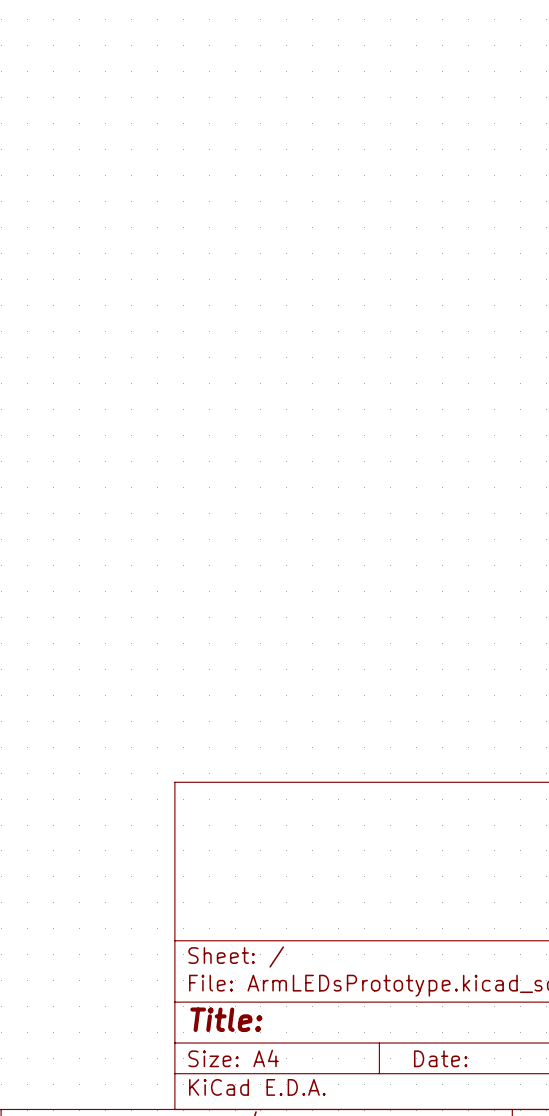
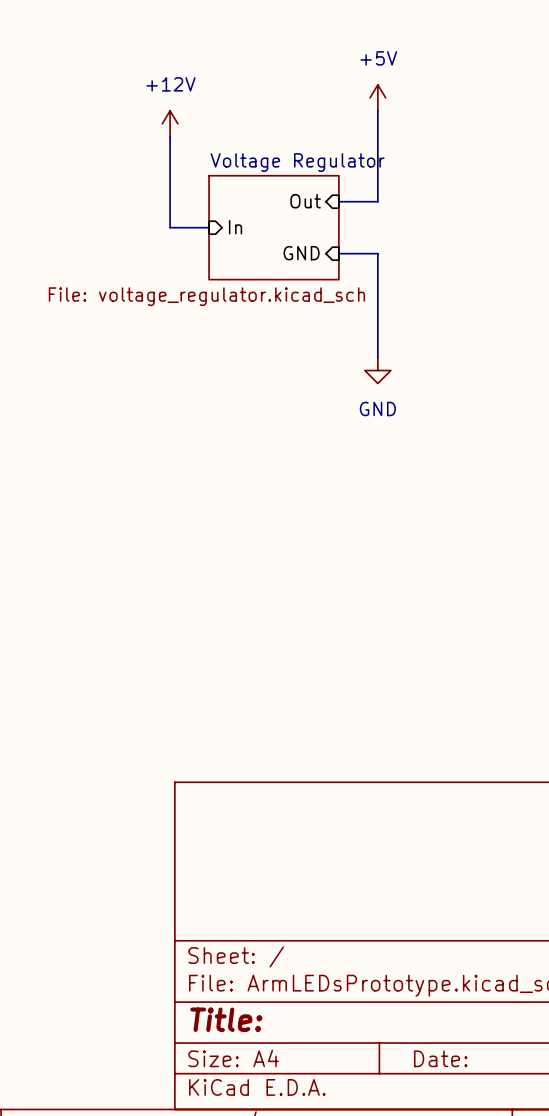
power symbol: none -> +5V (377, 97)
wire: none -> (377, 110) (377, 201) (338, 201)
power symbol: none -> +12V (170, 123)
wire: none -> (170, 136) (170, 227) (209, 227)
sheet pin: none -> Out (305, 201)
sheet pin: none -> In (235, 227)
sheet Voltage Regulator: none -> File: voltage_regulator.kicad_sch (273, 227)
sheet pin: none -> GND (301, 253)
wire: none -> (338, 253) (377, 253) (377, 357)
power symbol: none -> GND (377, 370)

